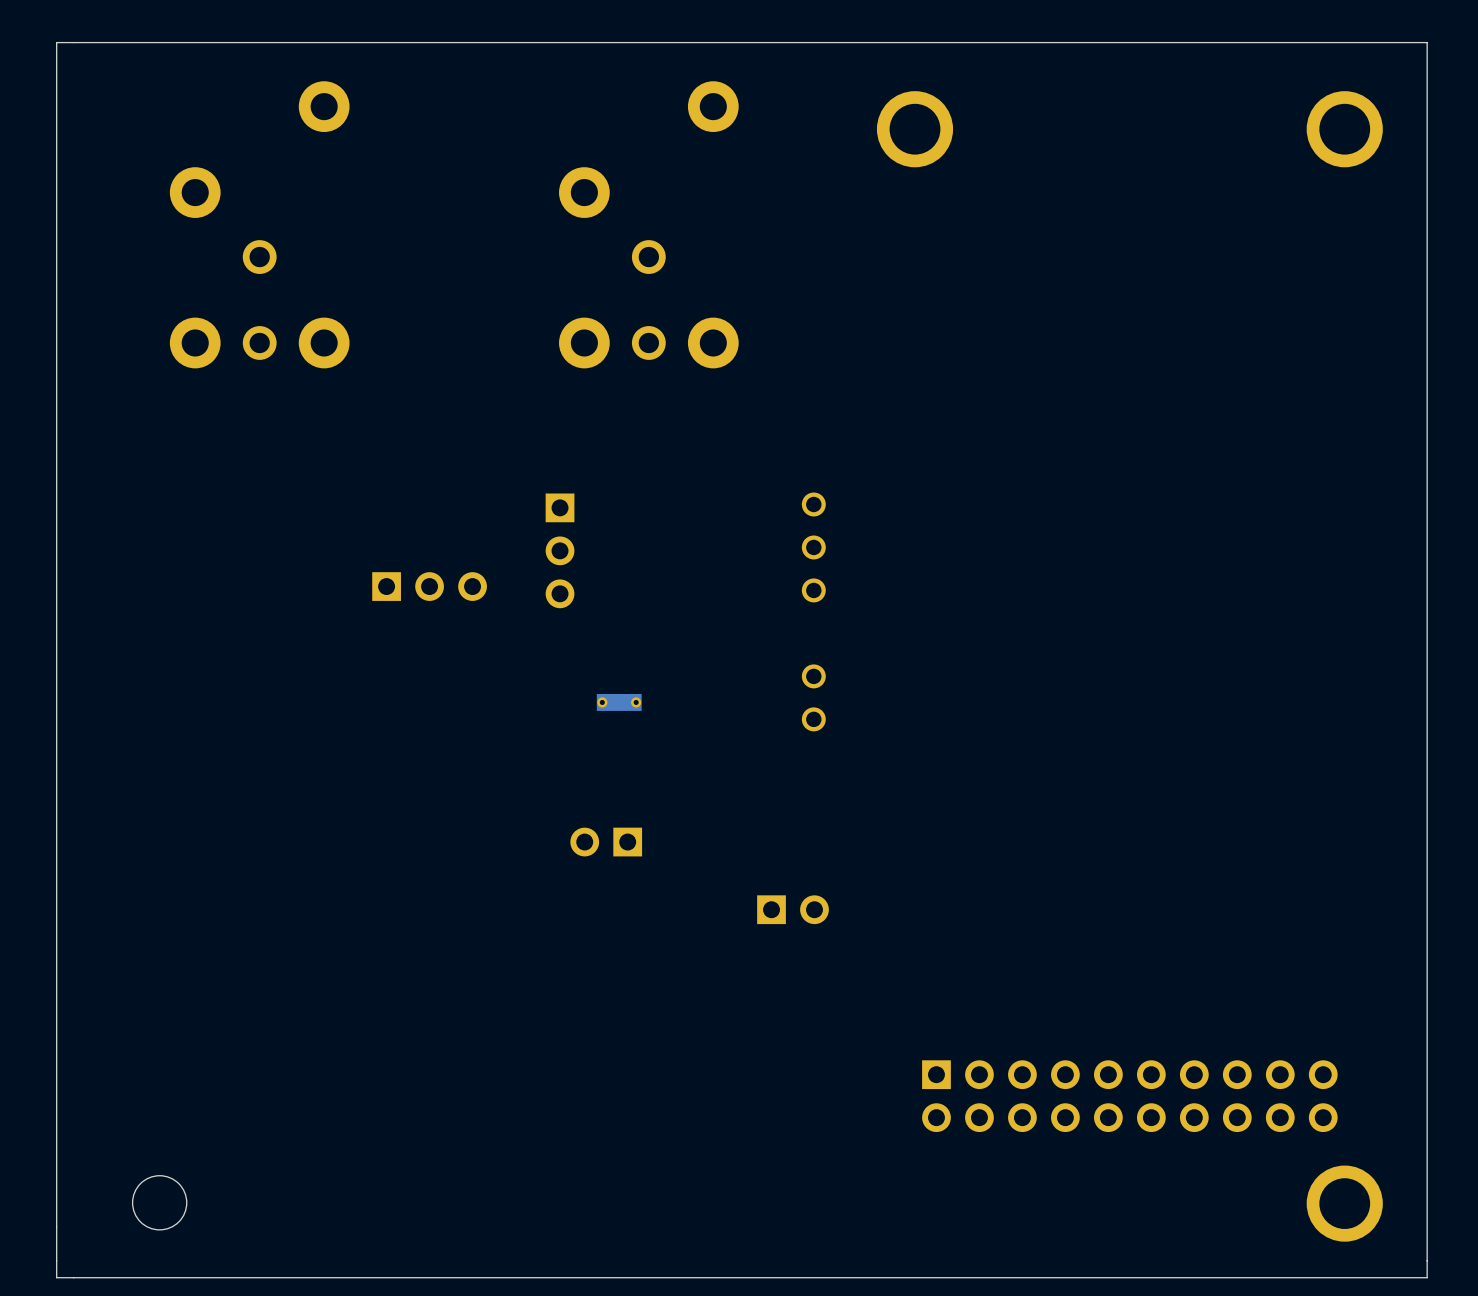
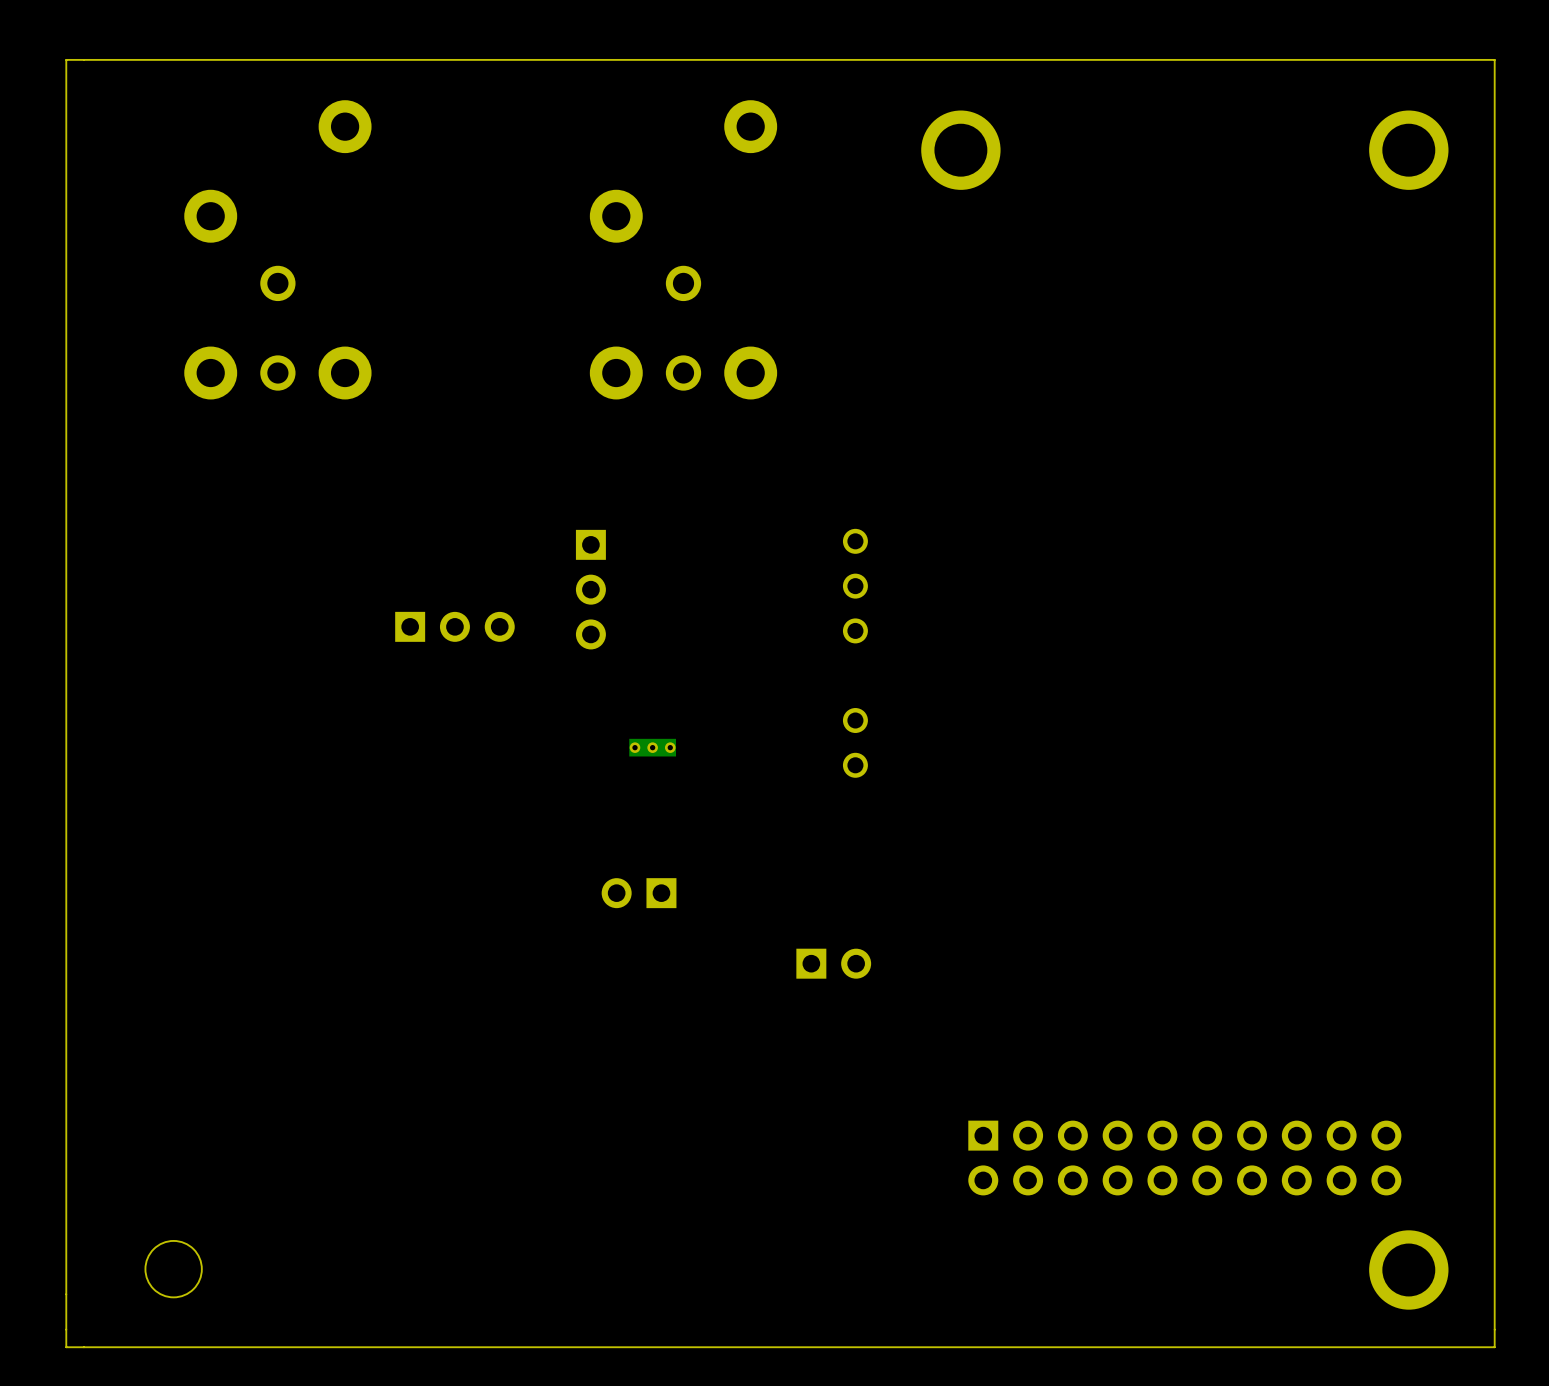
part footprint: [596, 693, 642, 711] -> [629, 738, 677, 757]

